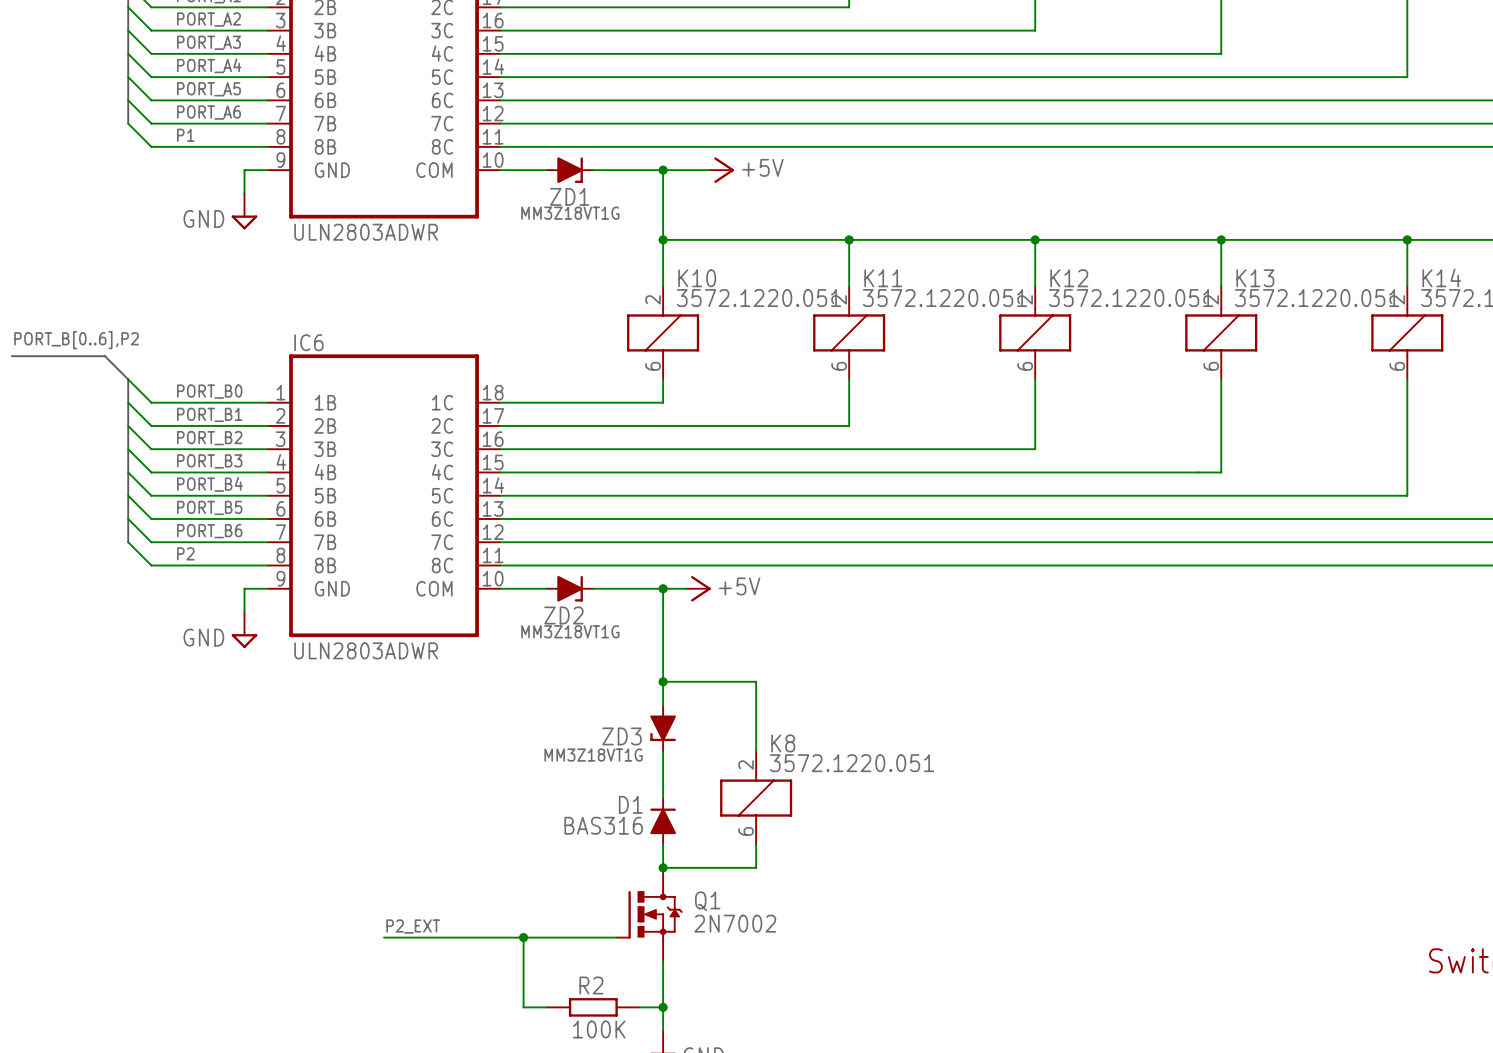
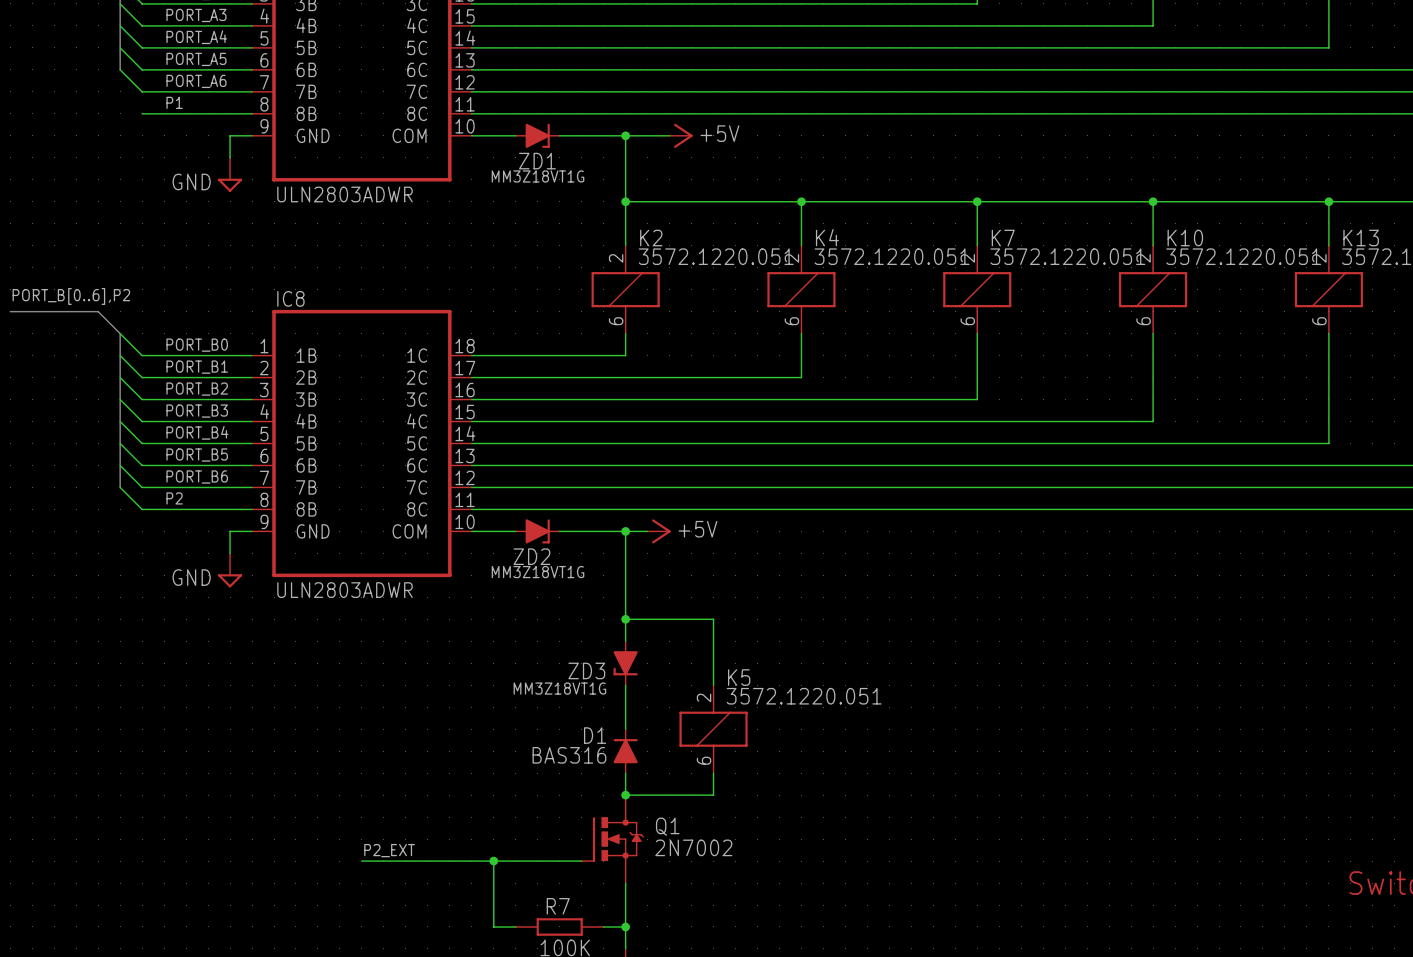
bus: (128, 100) (128, 123) -> none
wire: (128, 123) (151, 146) -> none
K14 name: K14 (1441, 277) -> K13 (1361, 238)
K10 name: K10 (697, 278) -> K2 (651, 238)
K11 name: K11 (883, 278) -> K4 (827, 237)
K12 name: K12 (1069, 278) -> K7 (1003, 238)
K13 name: K13 (1255, 278) -> K10 (1185, 238)
IC6 name: IC6 (308, 342) -> IC8 (290, 298)
K8 name: K8 (783, 743) -> K5 (739, 677)
R2 name: R2 (591, 985) -> R7 (558, 906)

